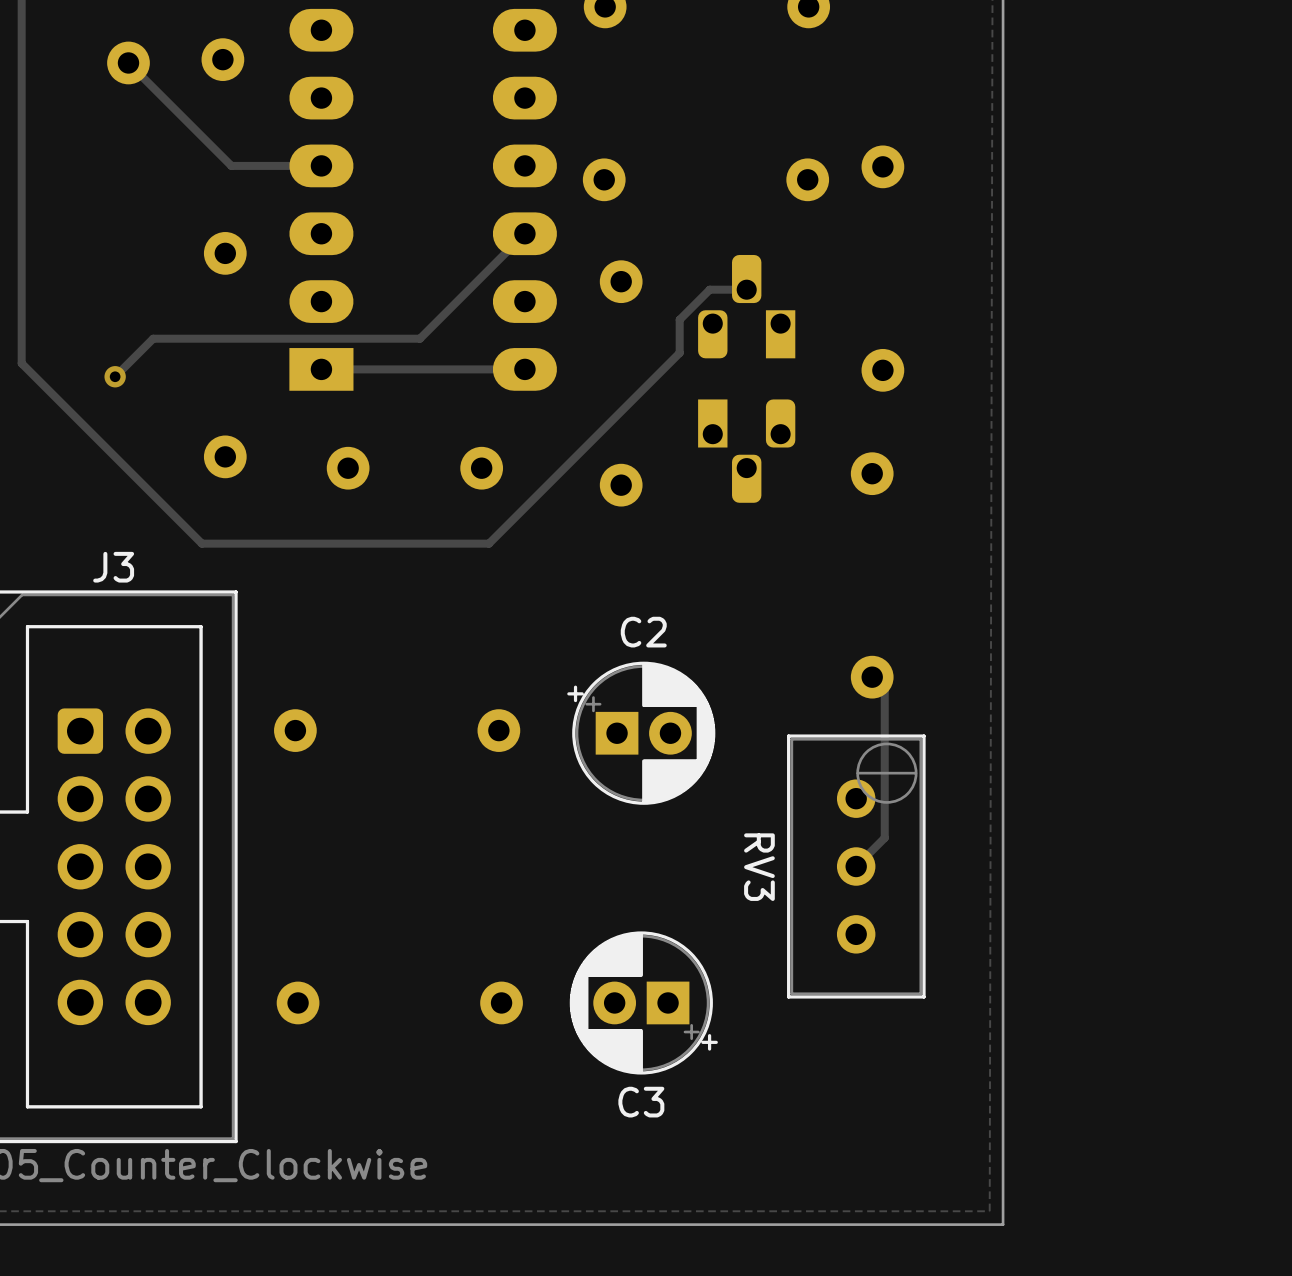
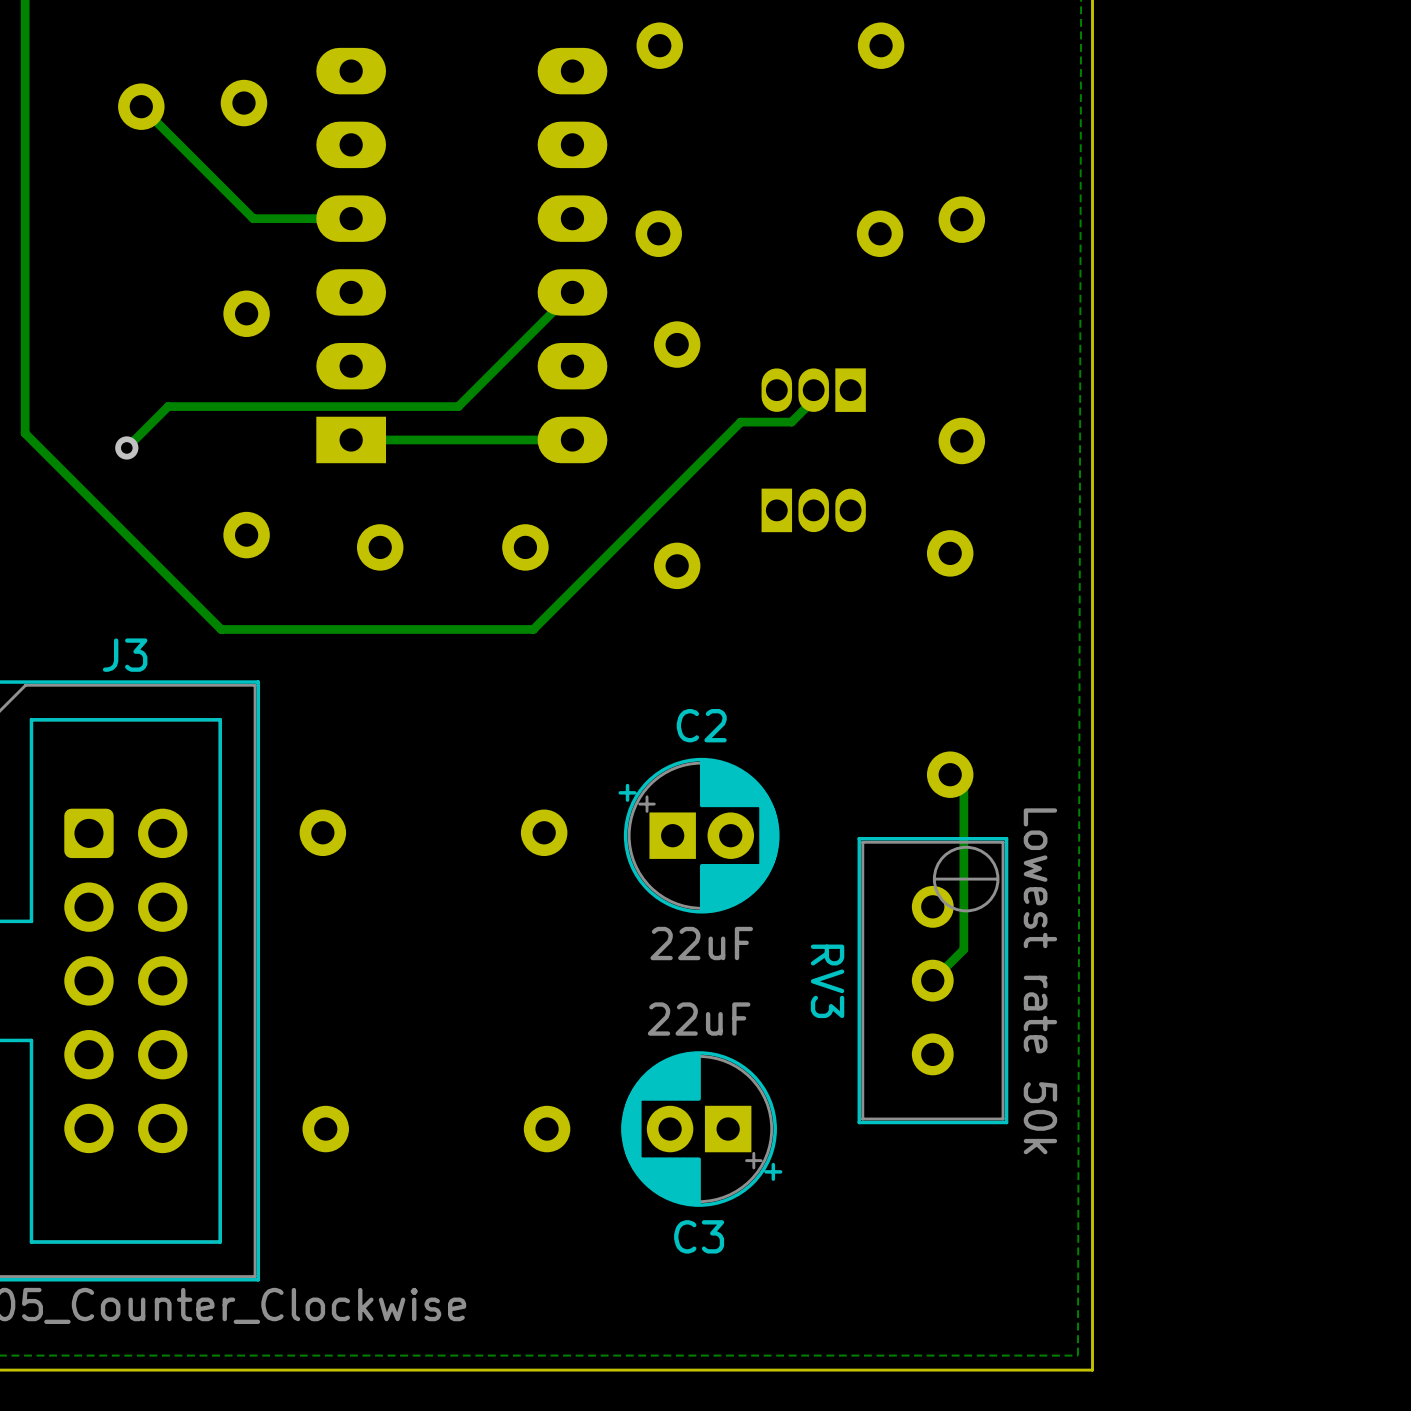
part footprint: [698, 254, 796, 359] -> [761, 368, 866, 412]
track: (746, 289) (709, 289) (679, 319) (679, 352) -> (813, 390) (813, 400) (791, 422) (740, 422)
part footprint: [698, 399, 796, 503] -> [761, 488, 866, 533]
C2 value: none -> 22uF (701, 943)
RV3 value: none -> Lowest rate 50k (1040, 981)
C3 value: none -> 22uF (699, 1019)

